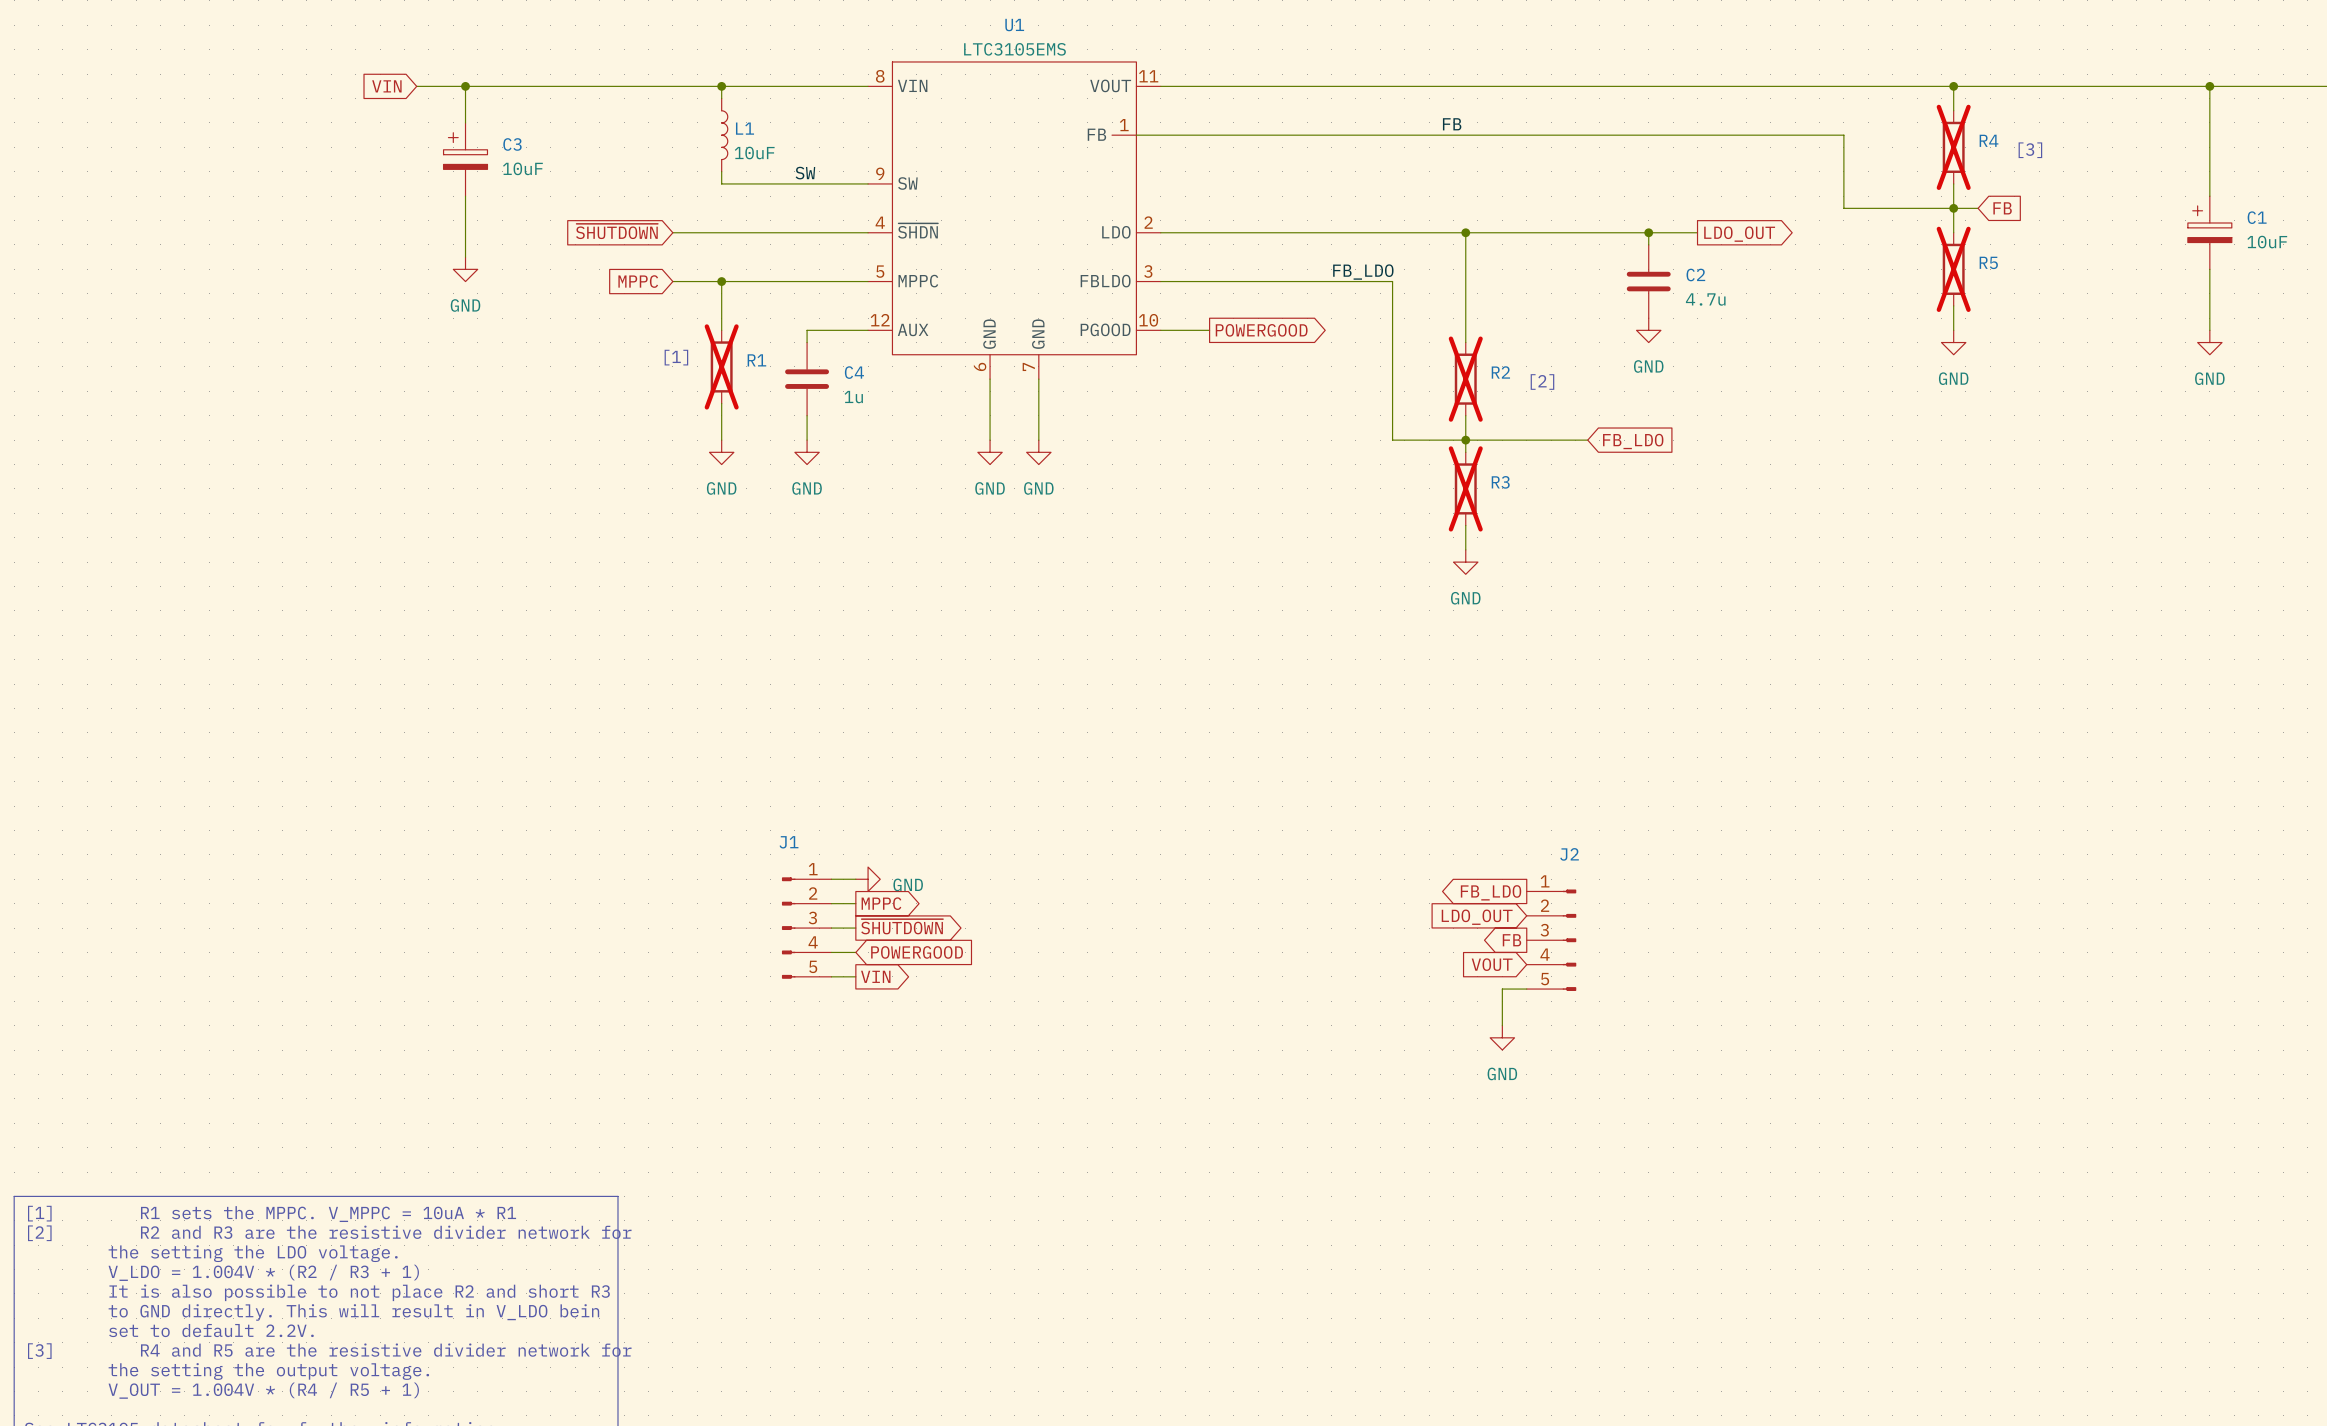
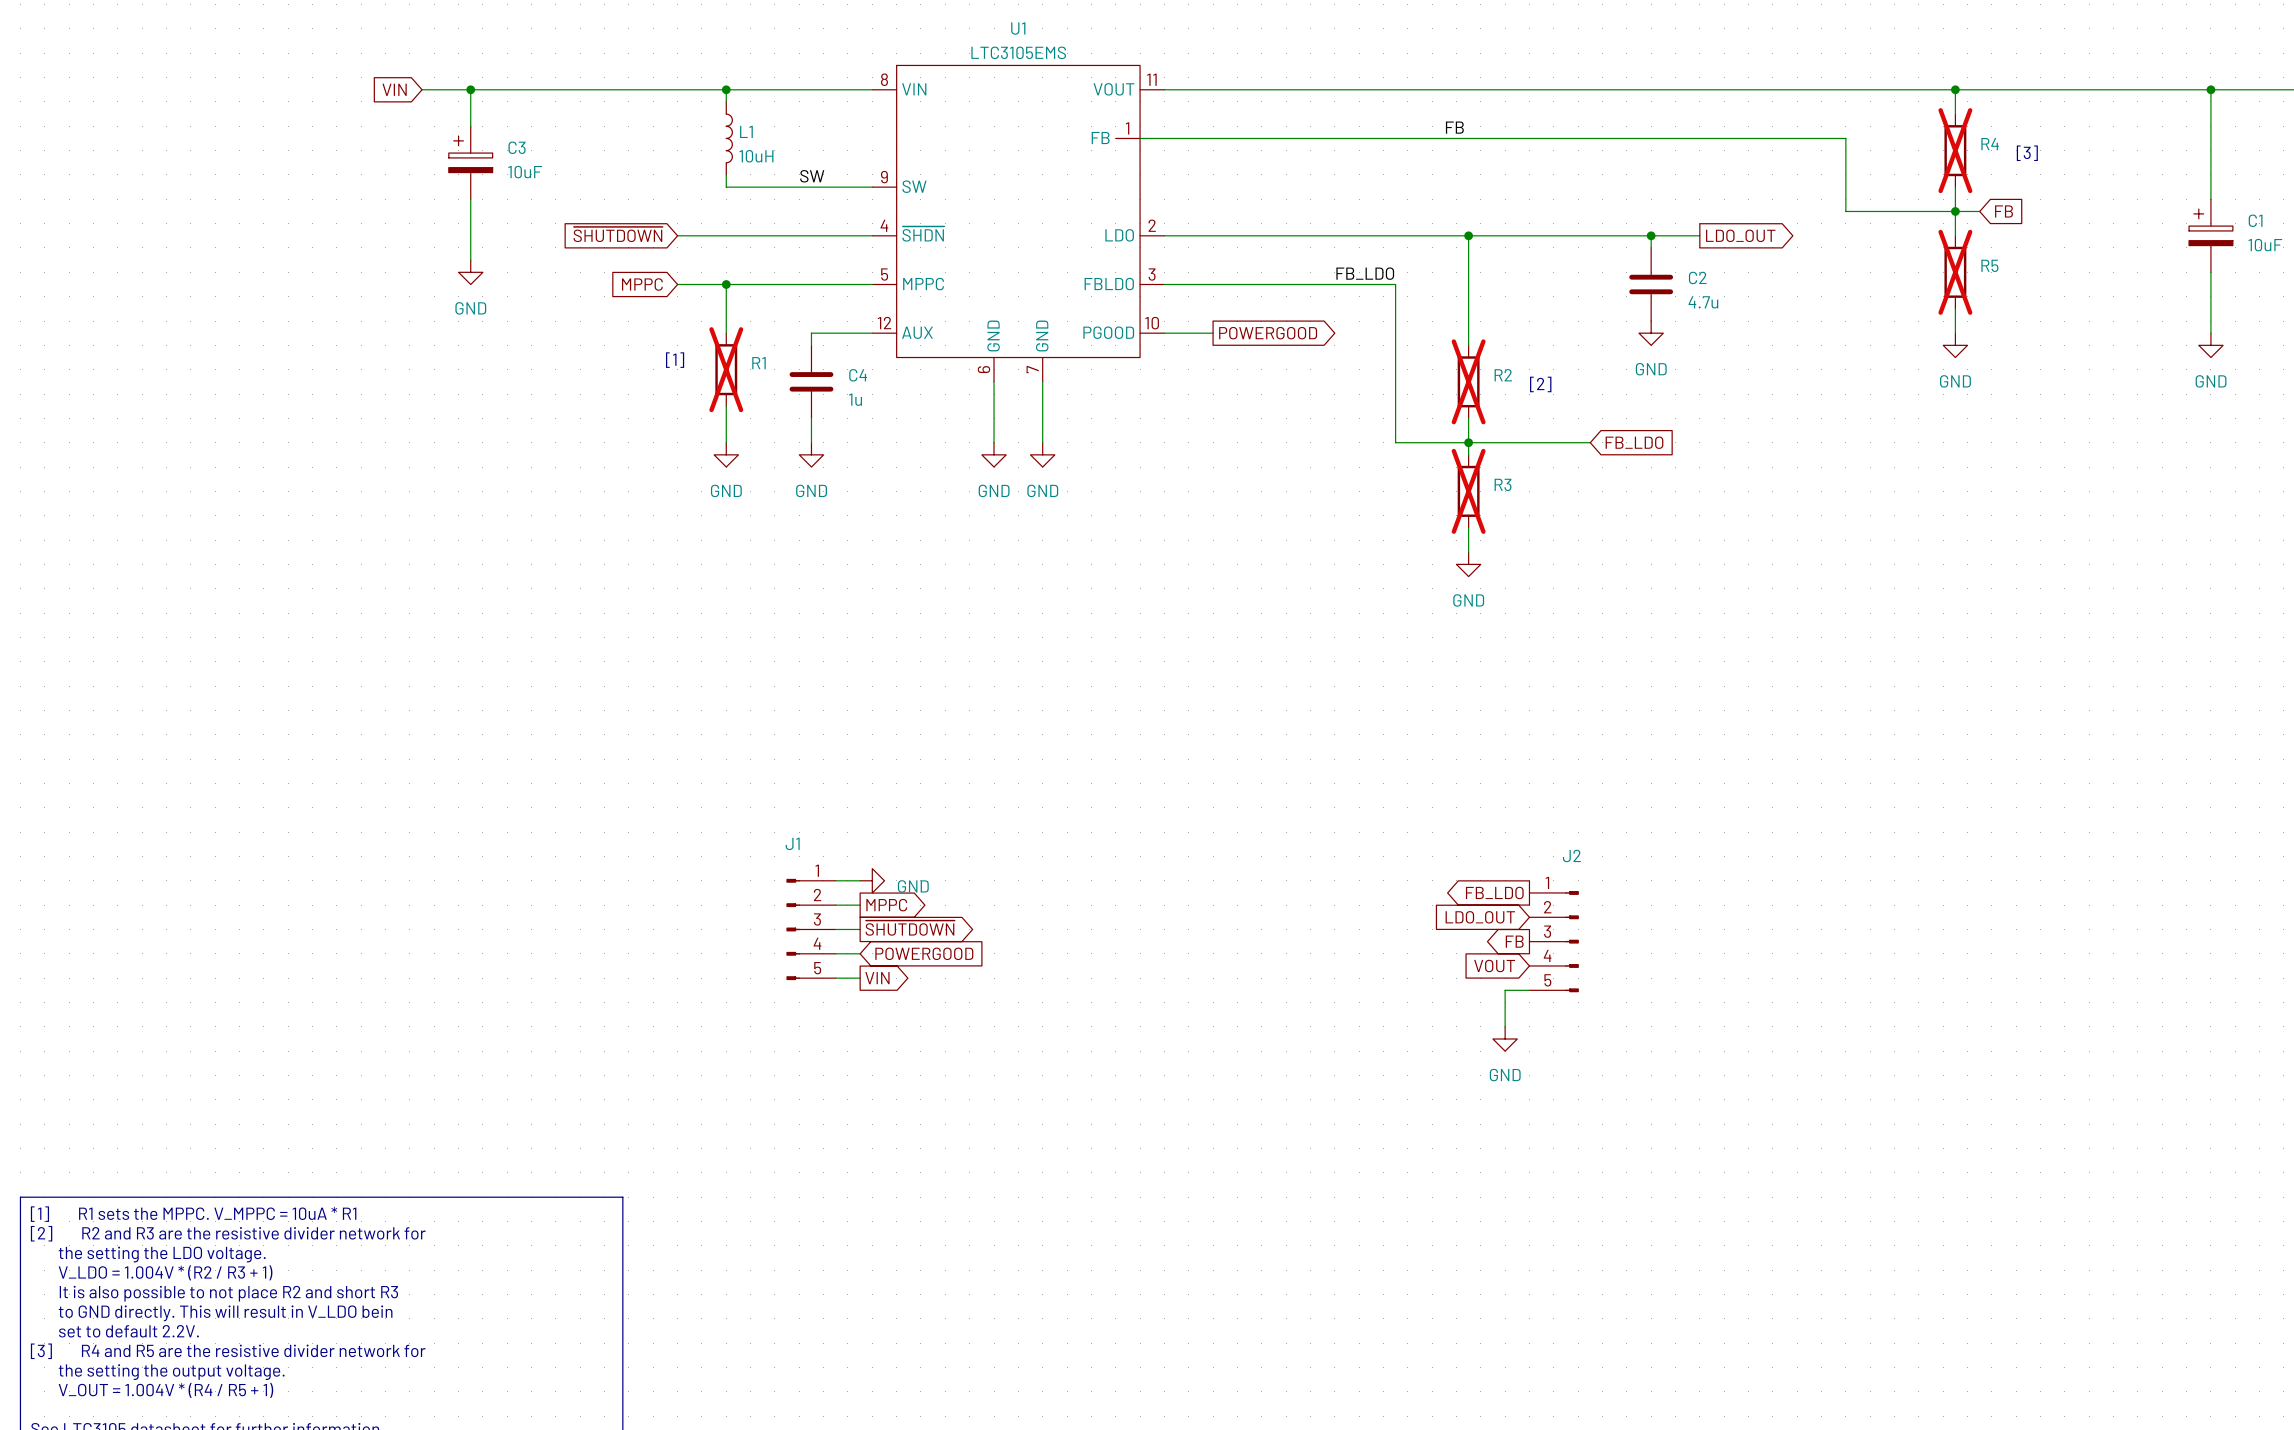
L1 value: 10uF (754, 153) -> 10uH (756, 156)

